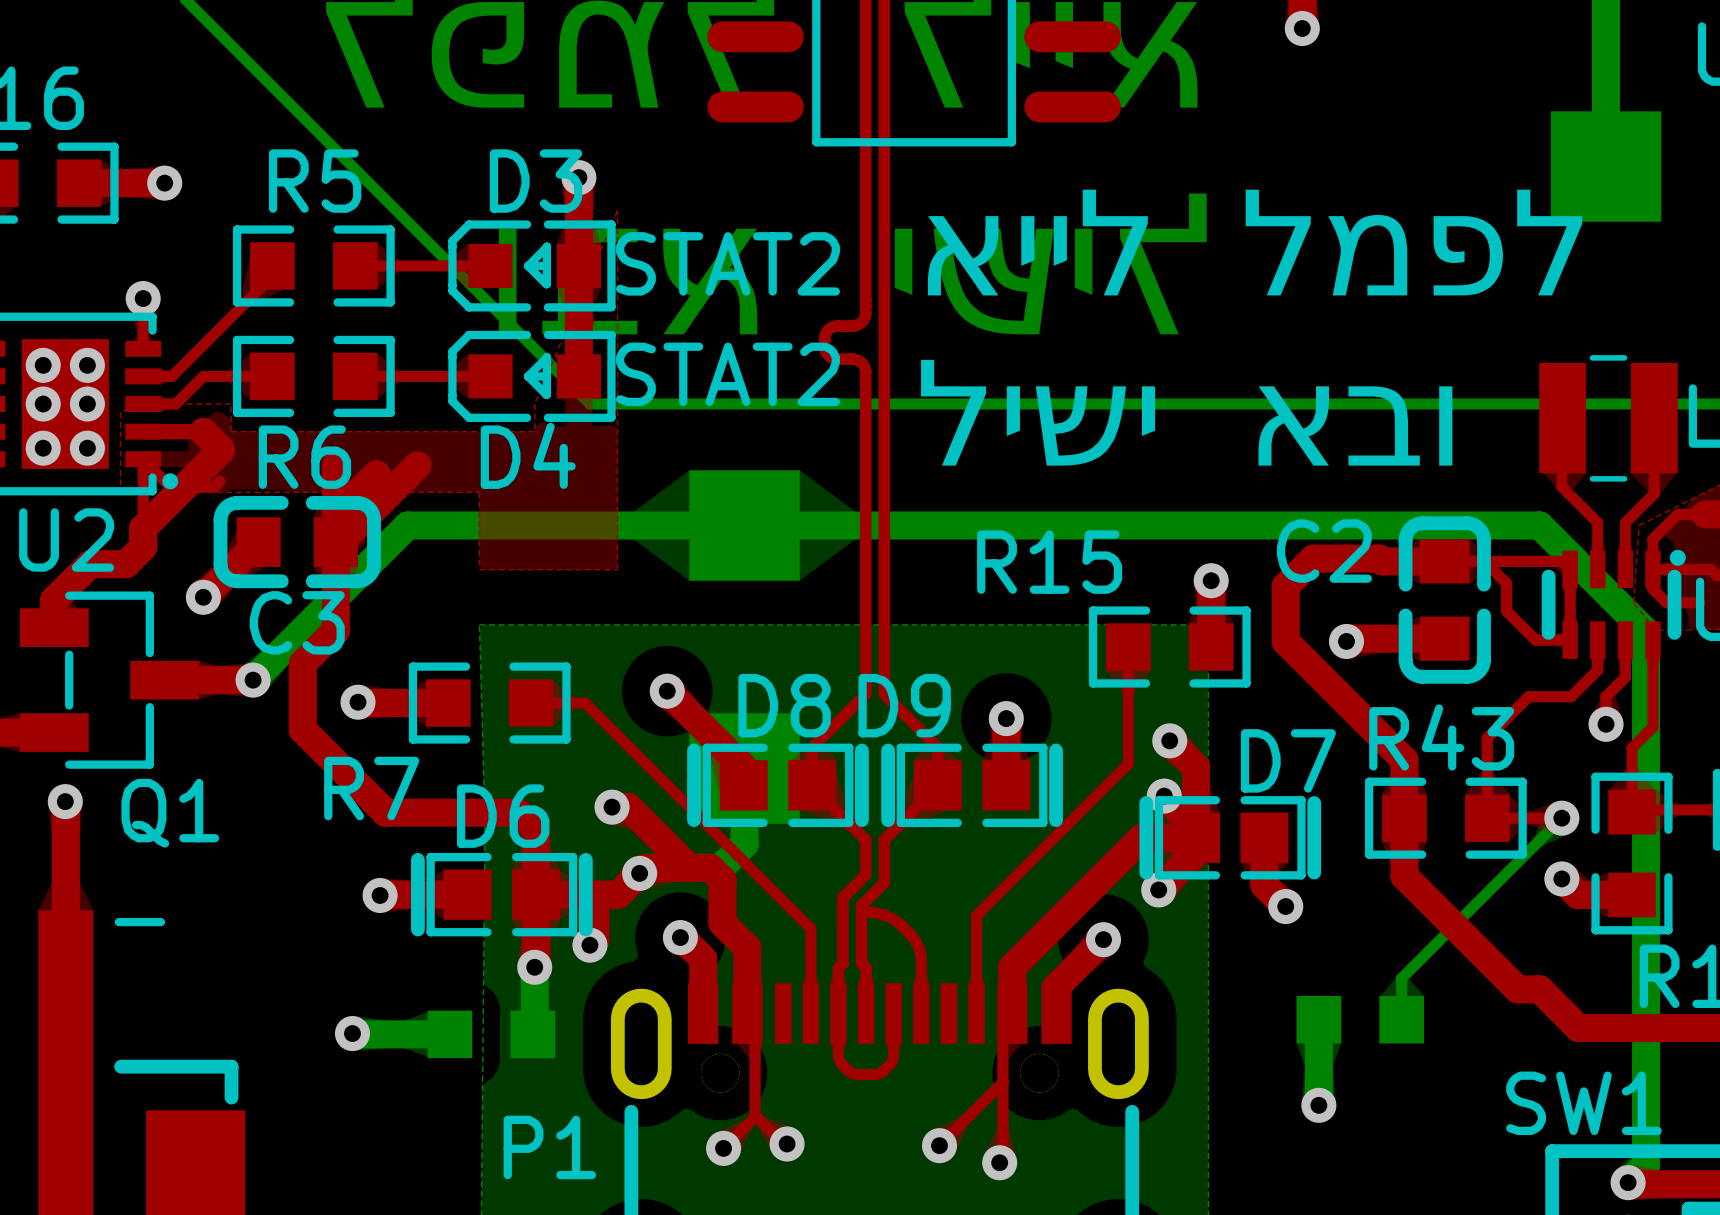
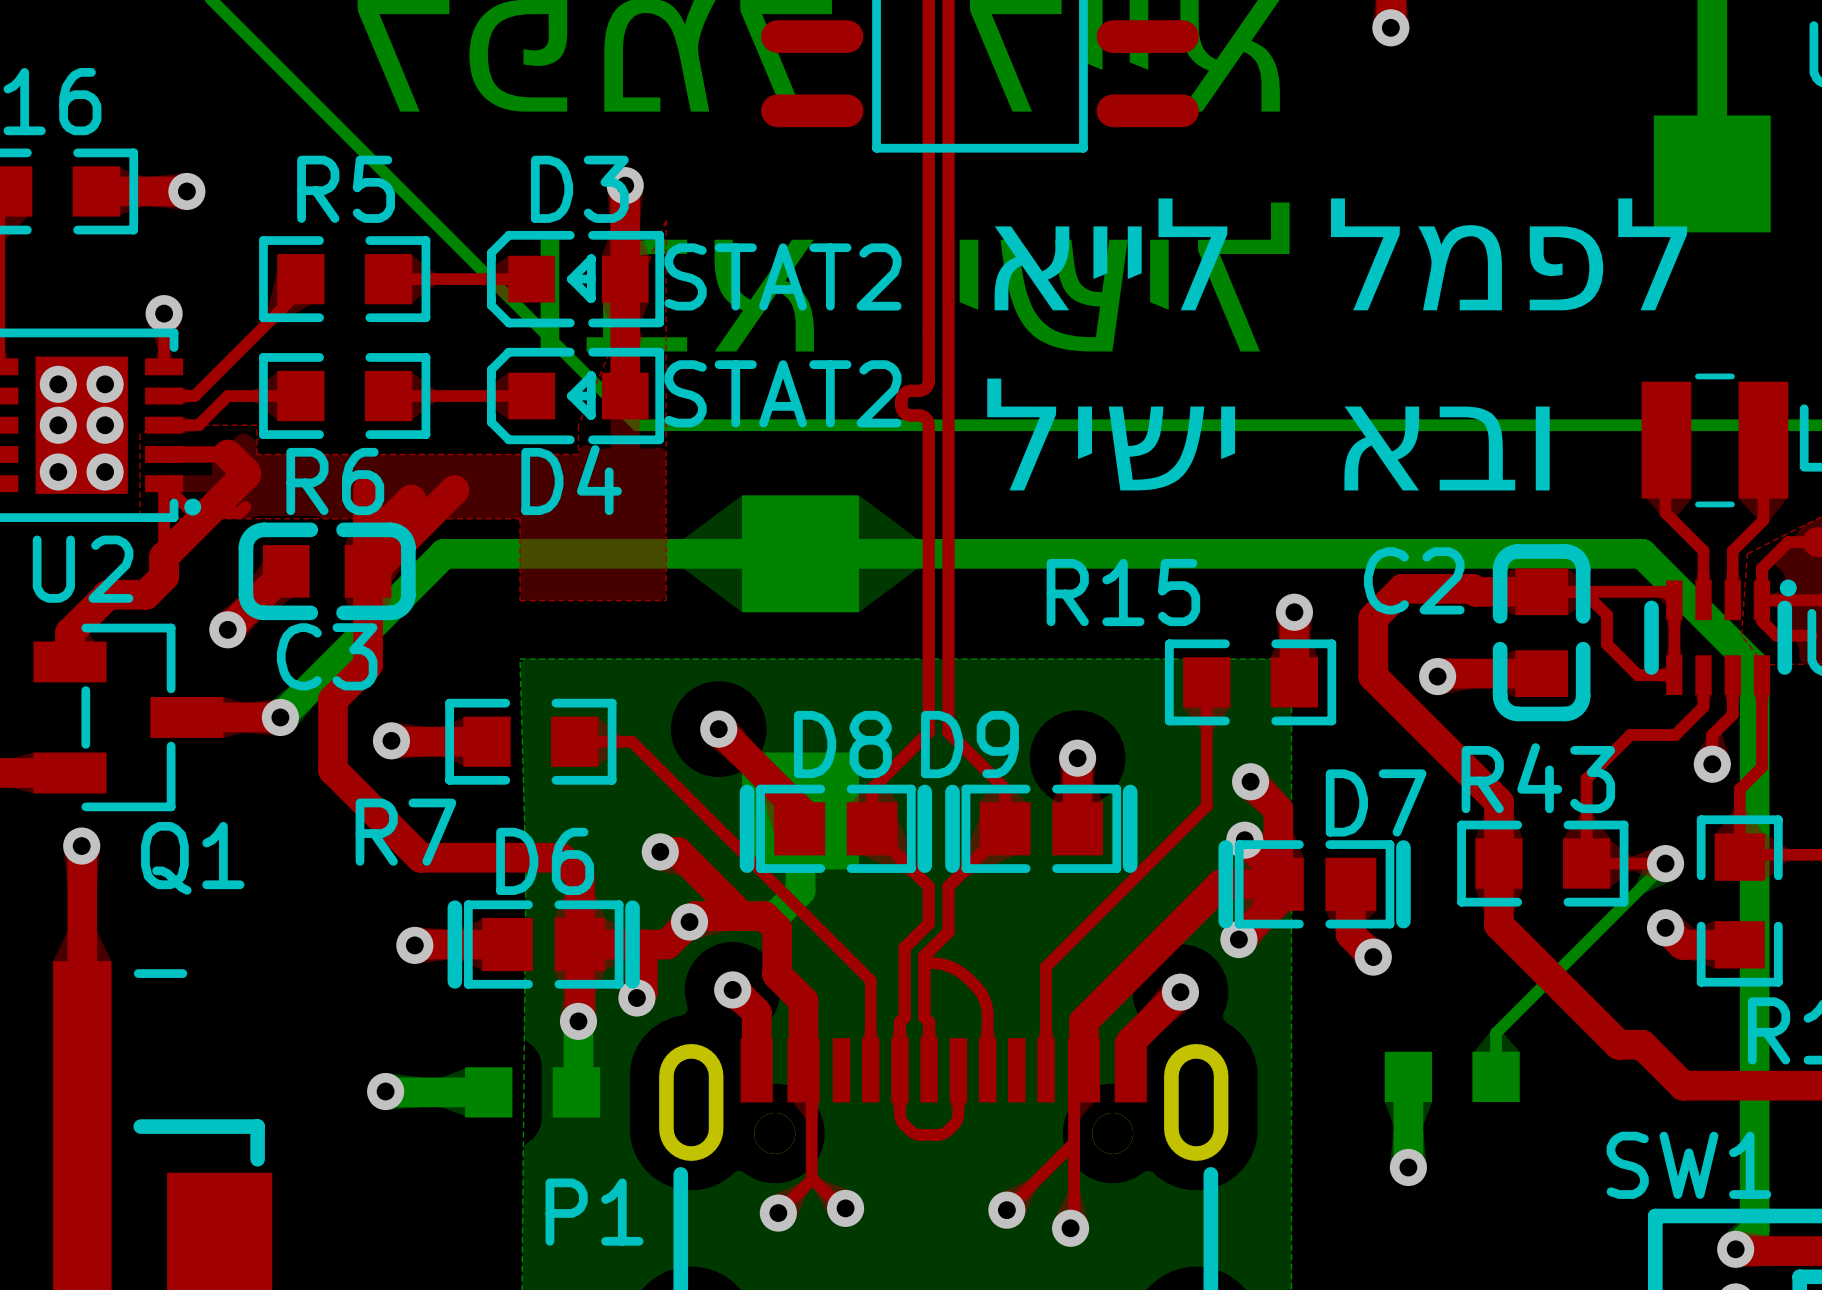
top track: (865, 312) (864, 318) (859, 324) (832, 327) (826, 332) (824, 339) (825, 350) (830, 357) (855, 359) (863, 365) (865, 372) (865, 404) -> (928, 328) (928, 384) (922, 390) (905, 392) (901, 400) (901, 408) (904, 413) (923, 416) (927, 420) (928, 425)

